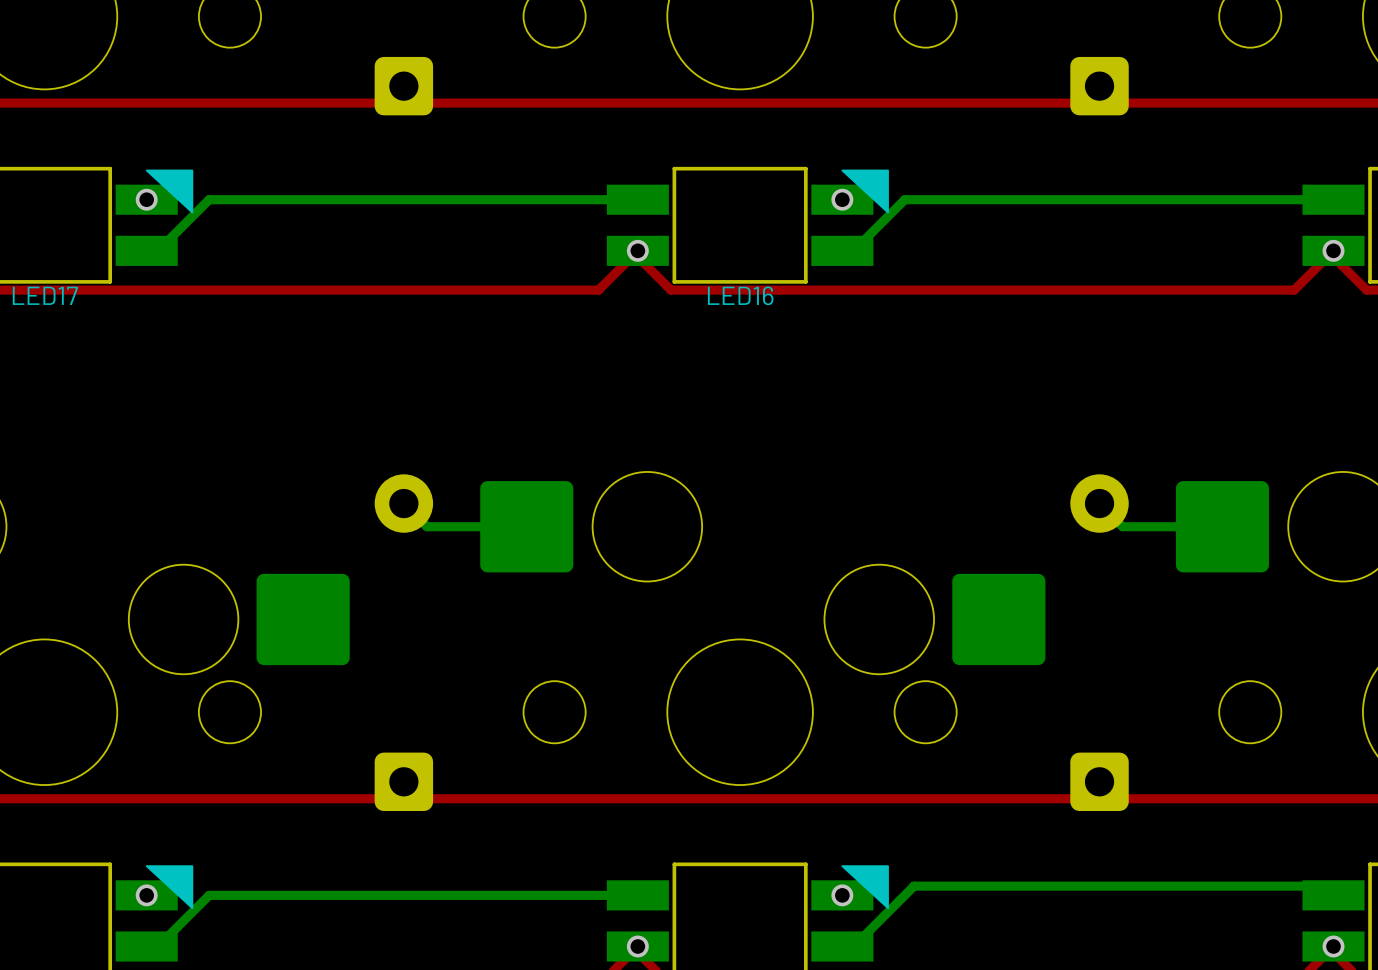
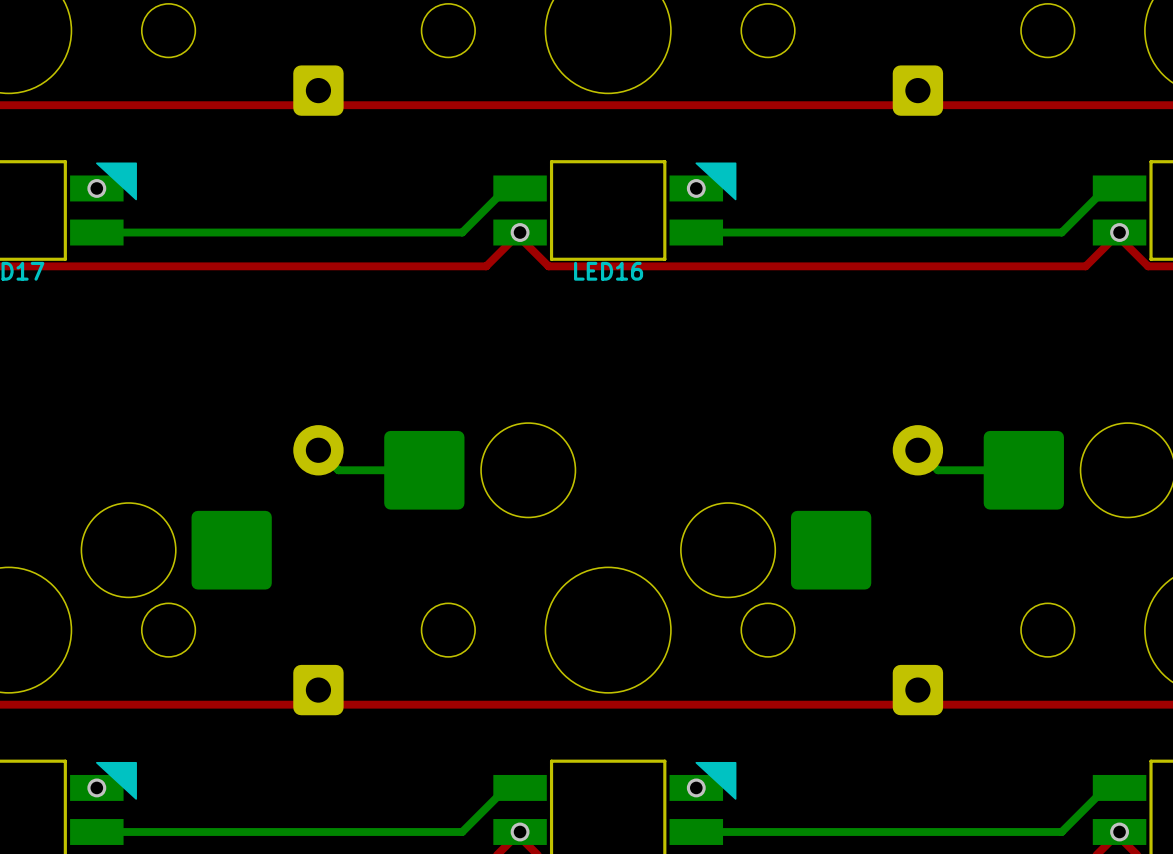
bottom track: (621, 199) (209, 199) (158, 250) -> (506, 188) (462, 232) (96, 232)
bottom track: (1317, 199) (904, 199) (853, 250) -> (1105, 188) (1061, 232) (696, 232)
bottom track: (1308, 886) (914, 886) (853, 946) -> none
bottom track: (621, 895) (209, 895) (158, 946) -> (506, 787) (462, 832) (96, 832)
bottom track: none -> (1105, 787) (1061, 832) (696, 832)

